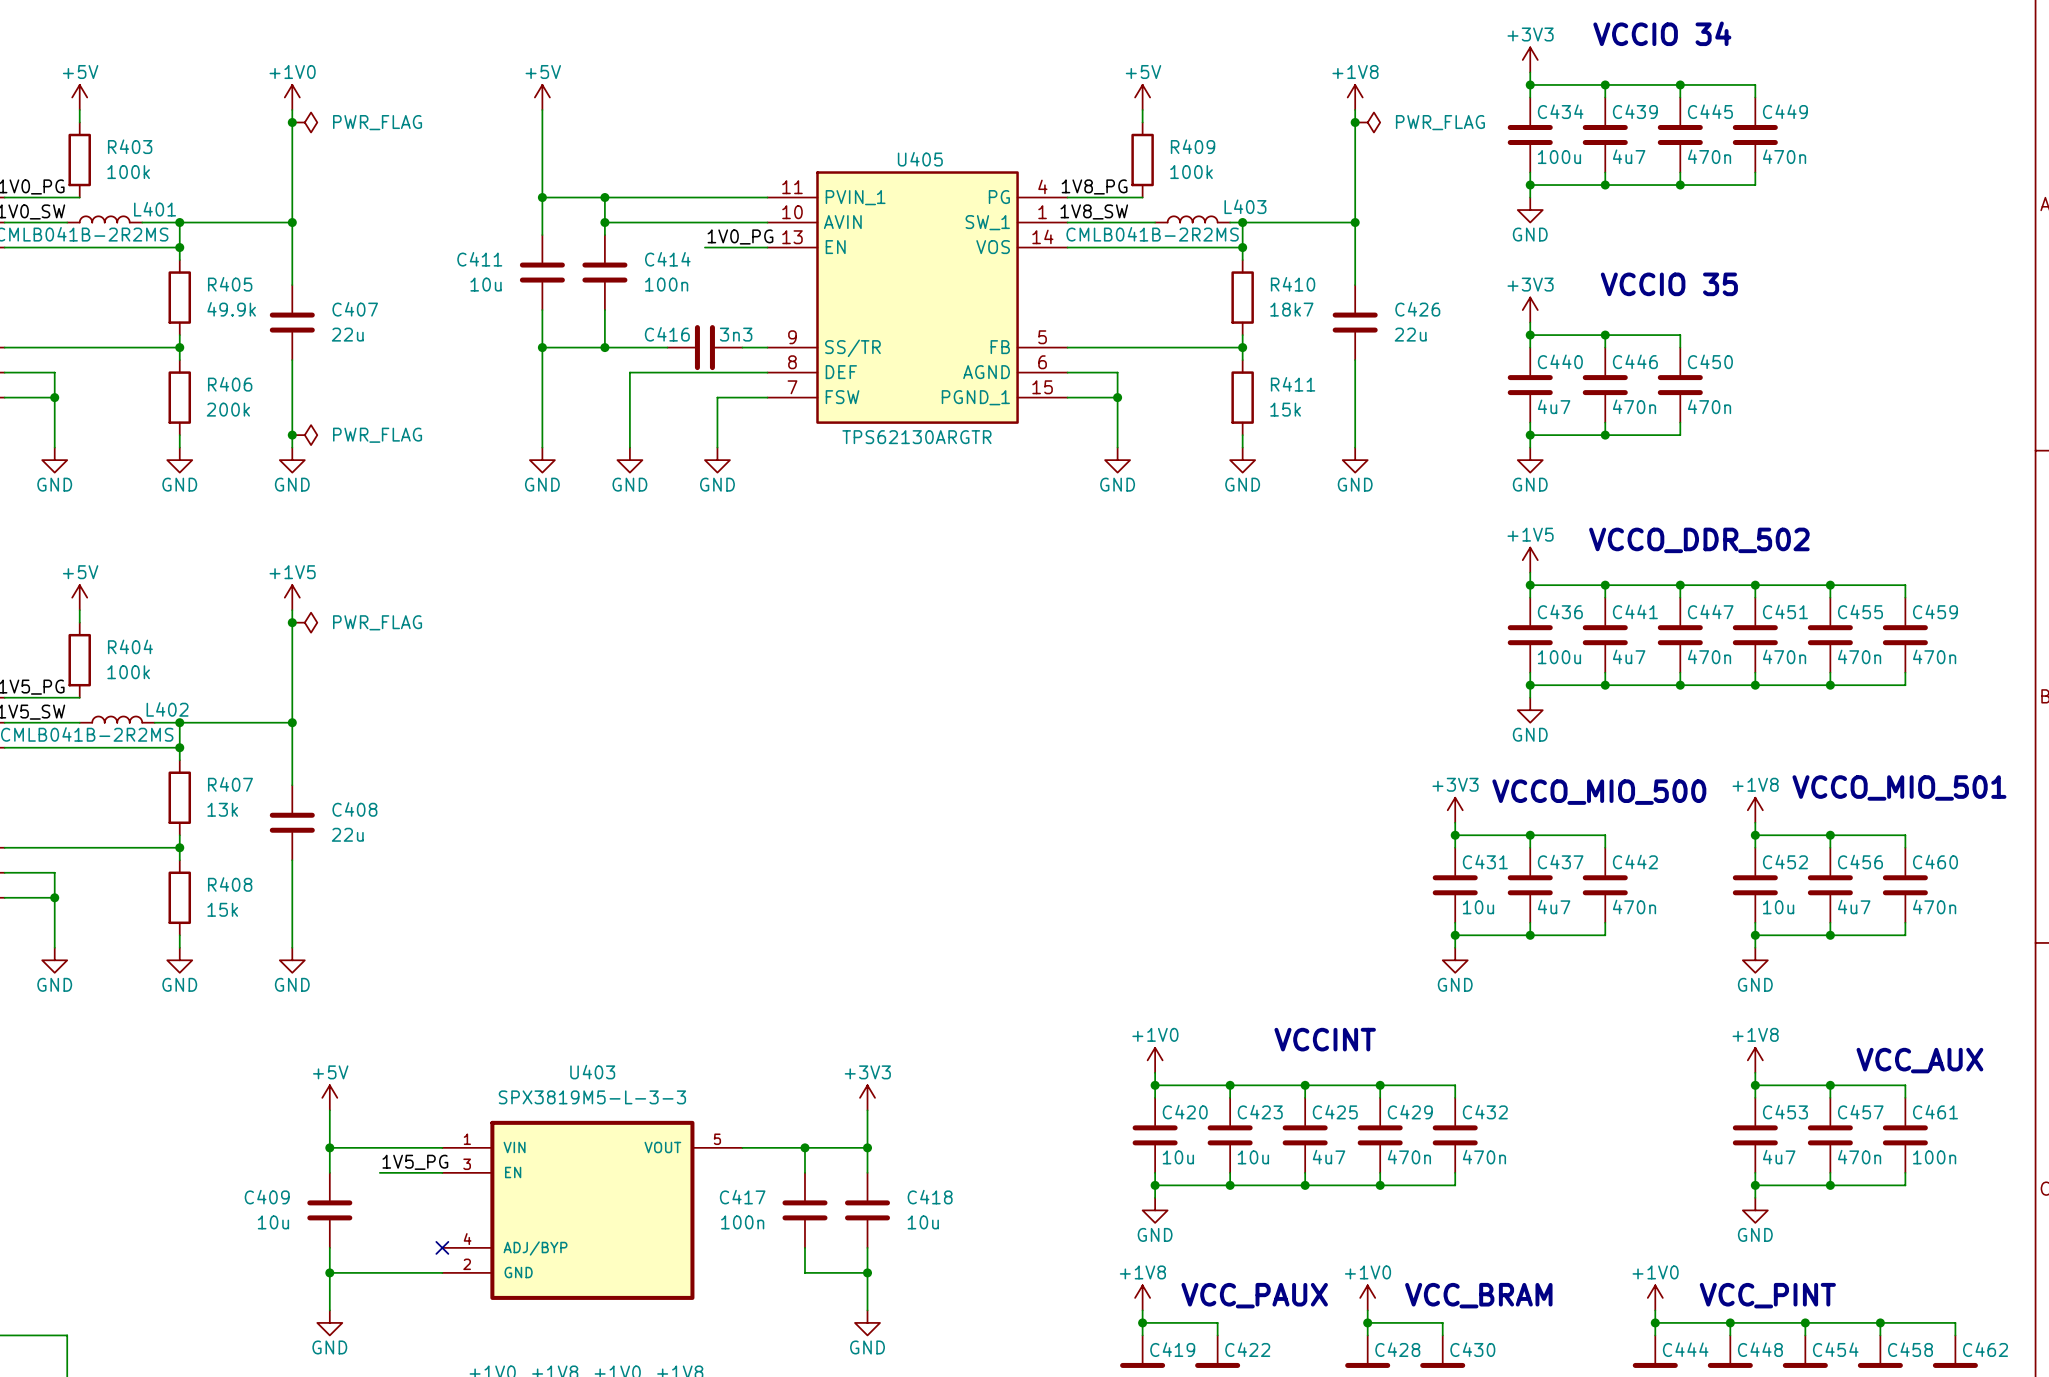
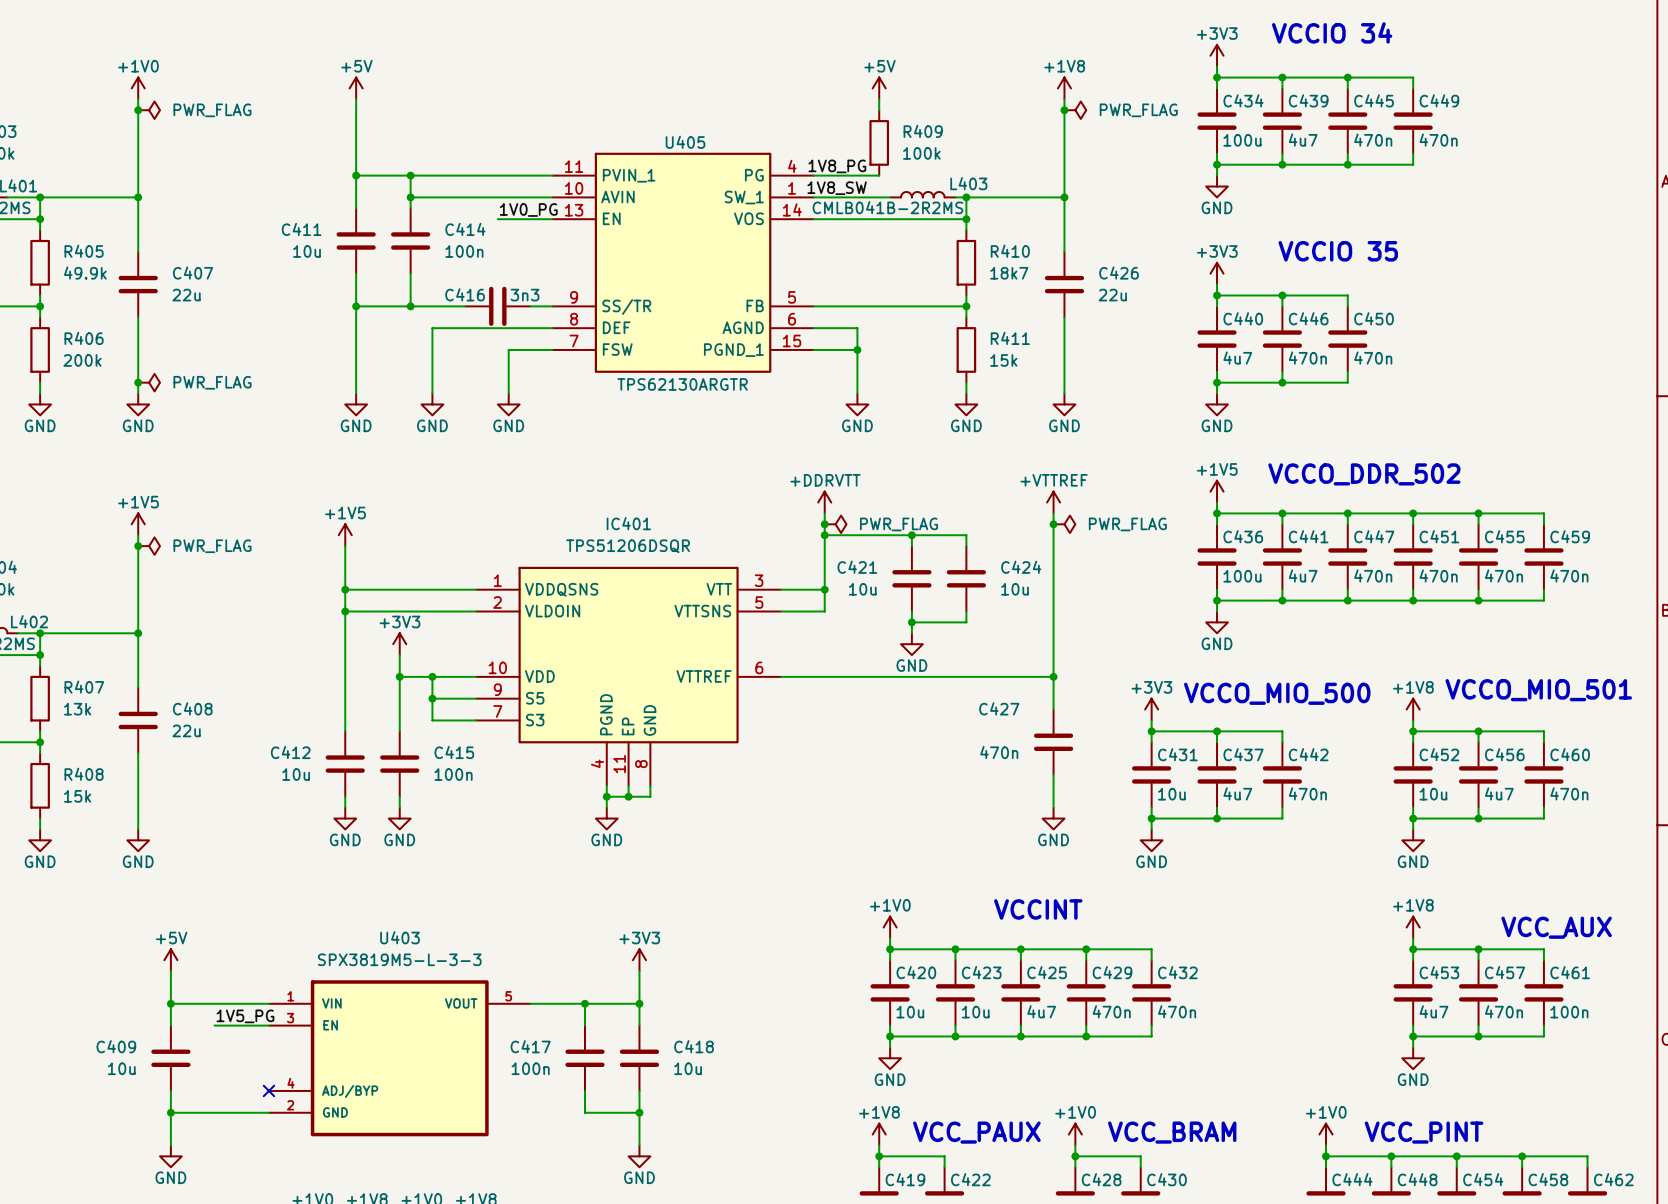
power symbol: none -> +DDRVTT (824, 502)
power symbol: none -> +VTTREF (1053, 502)
wire: none -> (824, 513) (824, 611) (781, 611)
wire: none -> (1053, 513) (1053, 709)
junction: none -> (824, 524)
power symbol: none -> PWR_FLAG (835, 524)
junction: none -> (1053, 524)
power symbol: none -> PWR_FLAG (1064, 524)
power symbol: none -> +1V5 (345, 535)
wire: none -> (824, 535) (966, 535) (966, 546)
junction: none -> (824, 535)
wire: none -> (911, 535) (911, 546)
junction: none -> (911, 535)
wire: none -> (345, 546) (345, 731)
C421: none -> 10u (911, 578)
C424: none -> 10u (966, 578)
wire: none -> (345, 589) (476, 589)
junction: none -> (345, 589)
wire: none -> (781, 589) (824, 589)
junction: none -> (824, 589)
wire: none -> (345, 611) (476, 611)
junction: none -> (345, 611)
wire: none -> (911, 611) (911, 633)
wire: none -> (966, 611) (966, 622) (911, 622)
junction: none -> (911, 622)
power symbol: none -> +3V3 (399, 644)
power symbol: none -> GND (911, 644)
wire: none -> (399, 655) (399, 731)
wire: none -> (399, 676) (476, 676)
junction: none -> (399, 676)
wire: none -> (432, 676) (432, 720) (476, 720)
junction: none -> (432, 676)
IC401: none -> TPS51206DSQR (628, 676)
wire: none -> (781, 676) (1053, 676)
junction: none -> (1053, 676)
wire: none -> (432, 698) (476, 698)
junction: none -> (432, 698)
C427: none -> 470n (1053, 742)
C412: none -> 10u (345, 764)
C415: none -> 100n (399, 764)
wire: none -> (1053, 774) (1053, 807)
wire: none -> (606, 785) (606, 807)
wire: none -> (628, 785) (628, 796)
wire: none -> (650, 785) (650, 796) (606, 796)
wire: none -> (345, 796) (345, 807)
wire: none -> (399, 796) (399, 807)
junction: none -> (606, 796)
junction: none -> (628, 796)
power symbol: none -> GND (345, 818)
power symbol: none -> GND (399, 818)
power symbol: none -> GND (606, 818)
power symbol: none -> GND (1053, 818)

